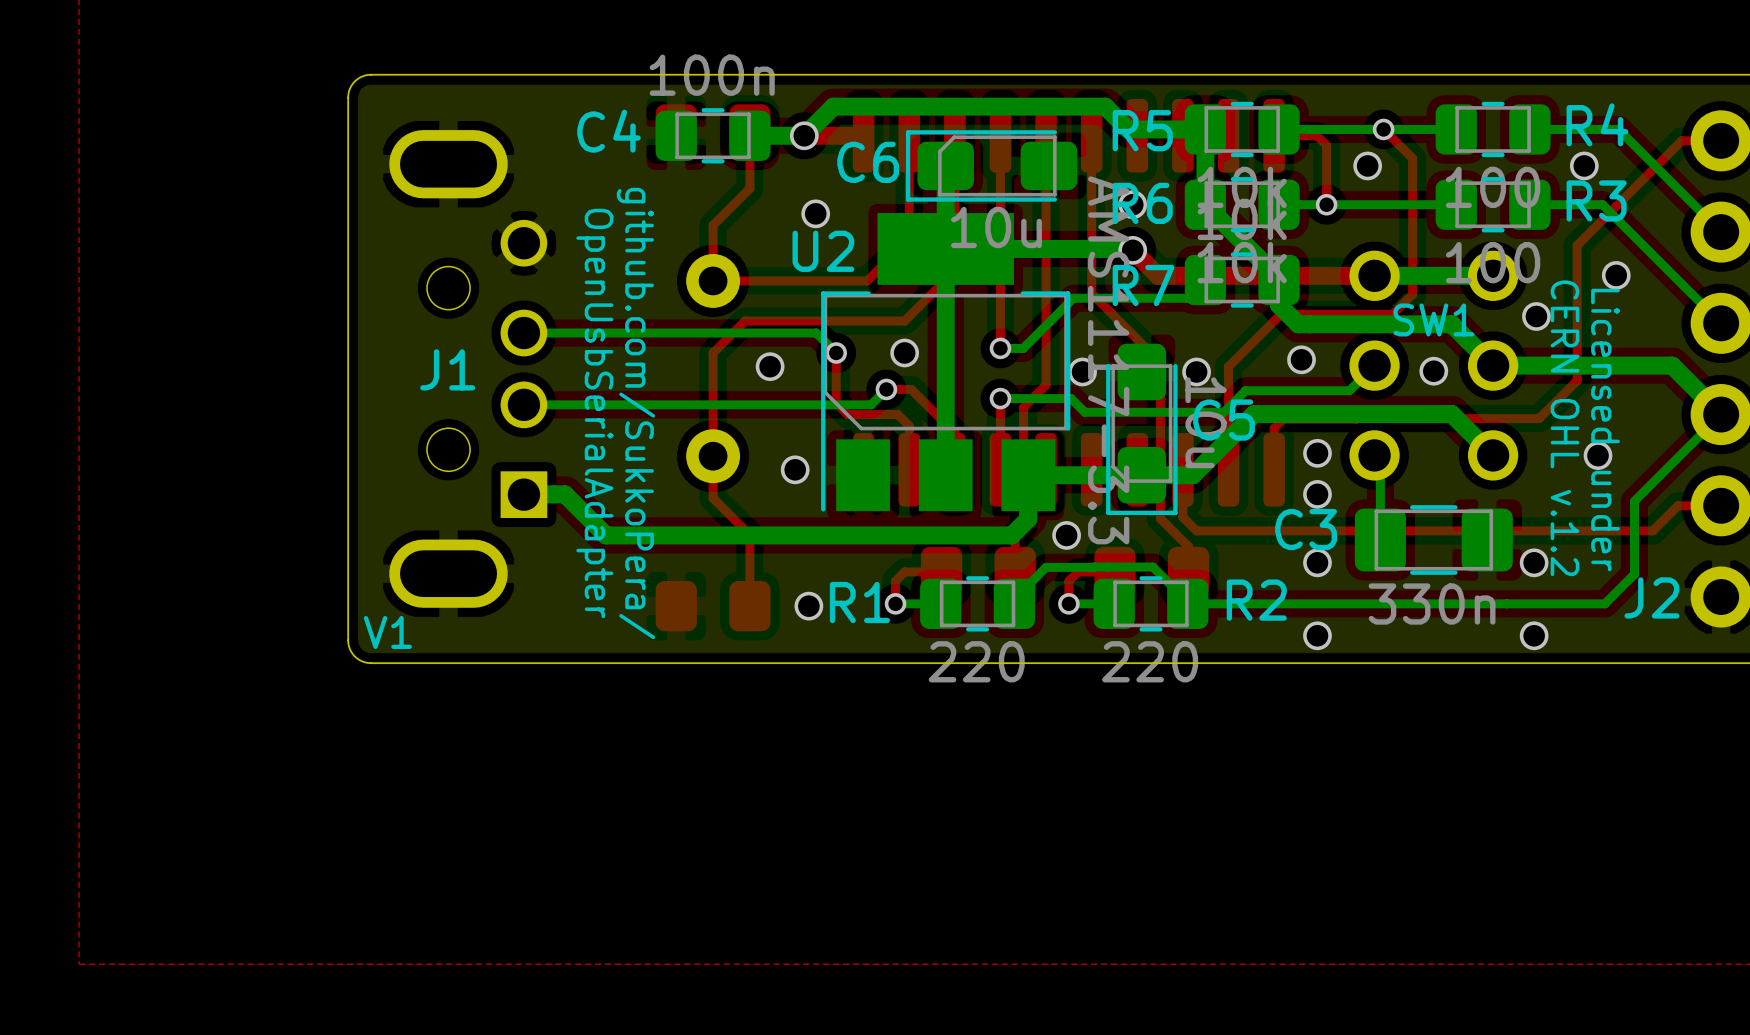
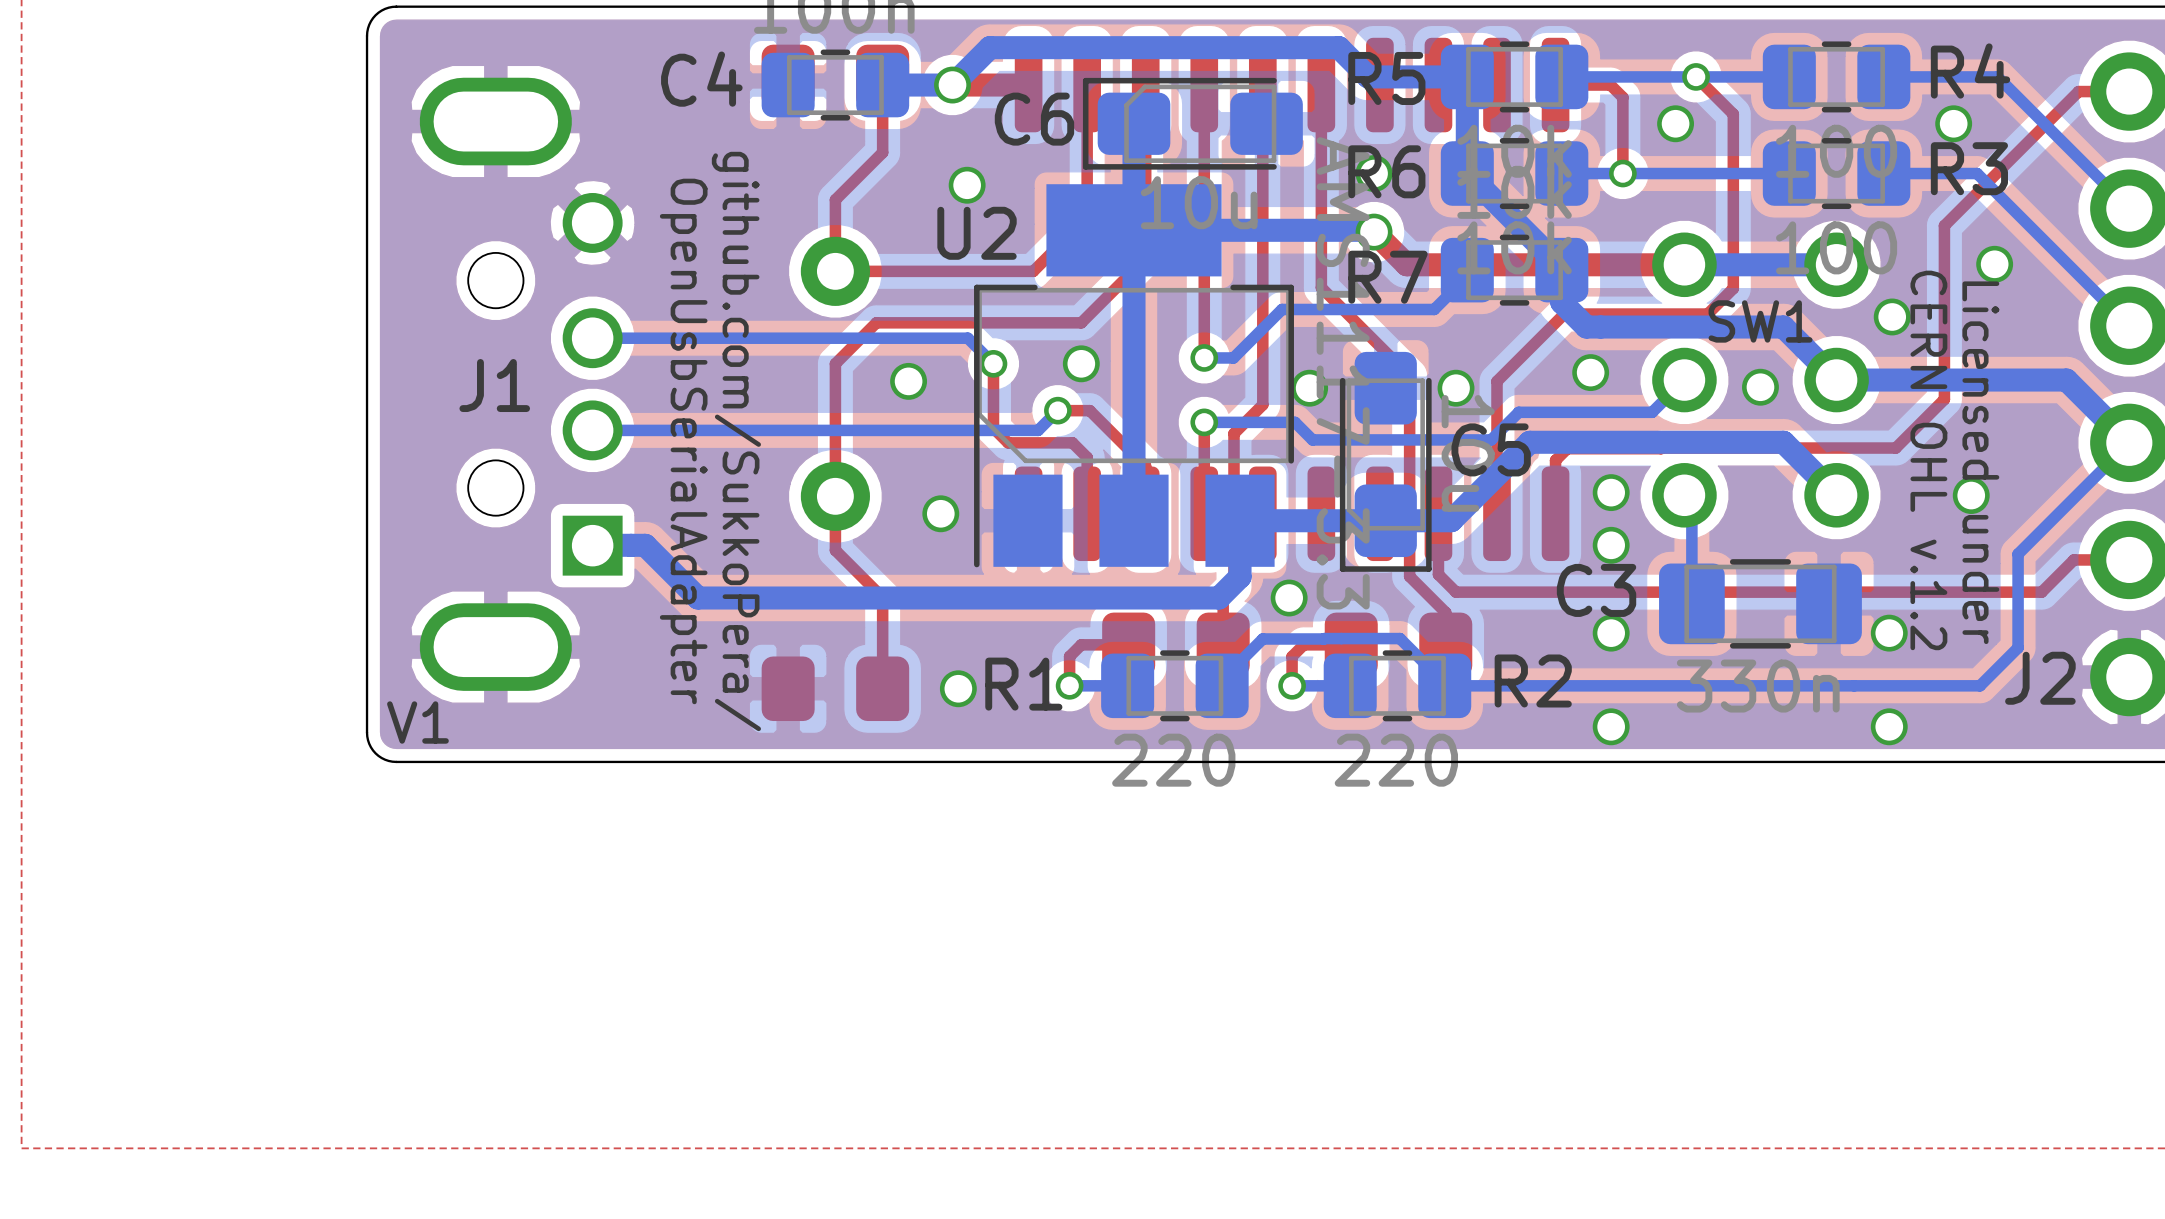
bottom track: (1205, 279) (1187, 298) (1073, 298) (1061, 310) -> (1467, 270) (1467, 276) (1434, 309) (1282, 309)

